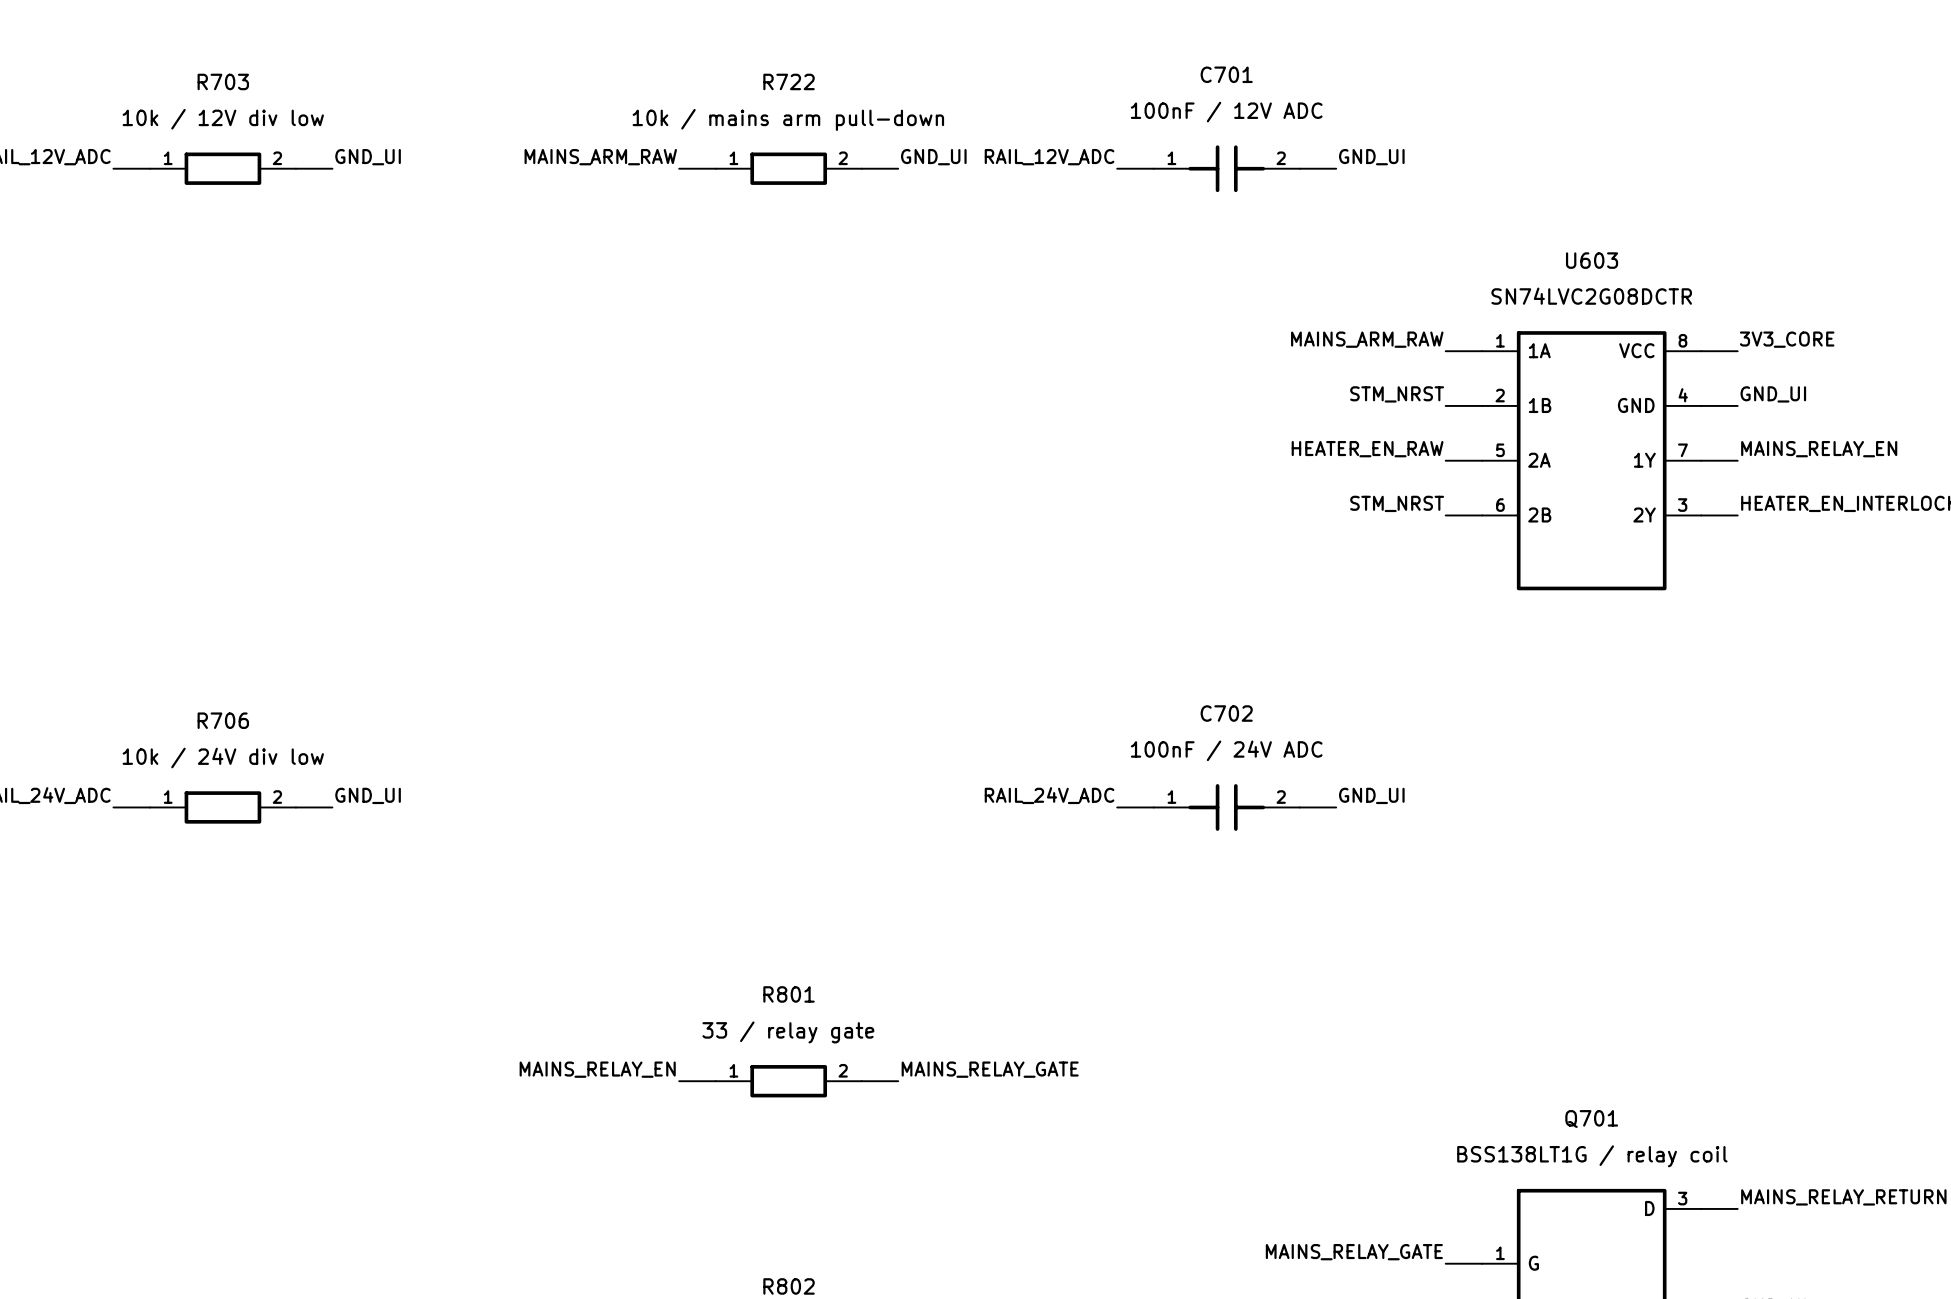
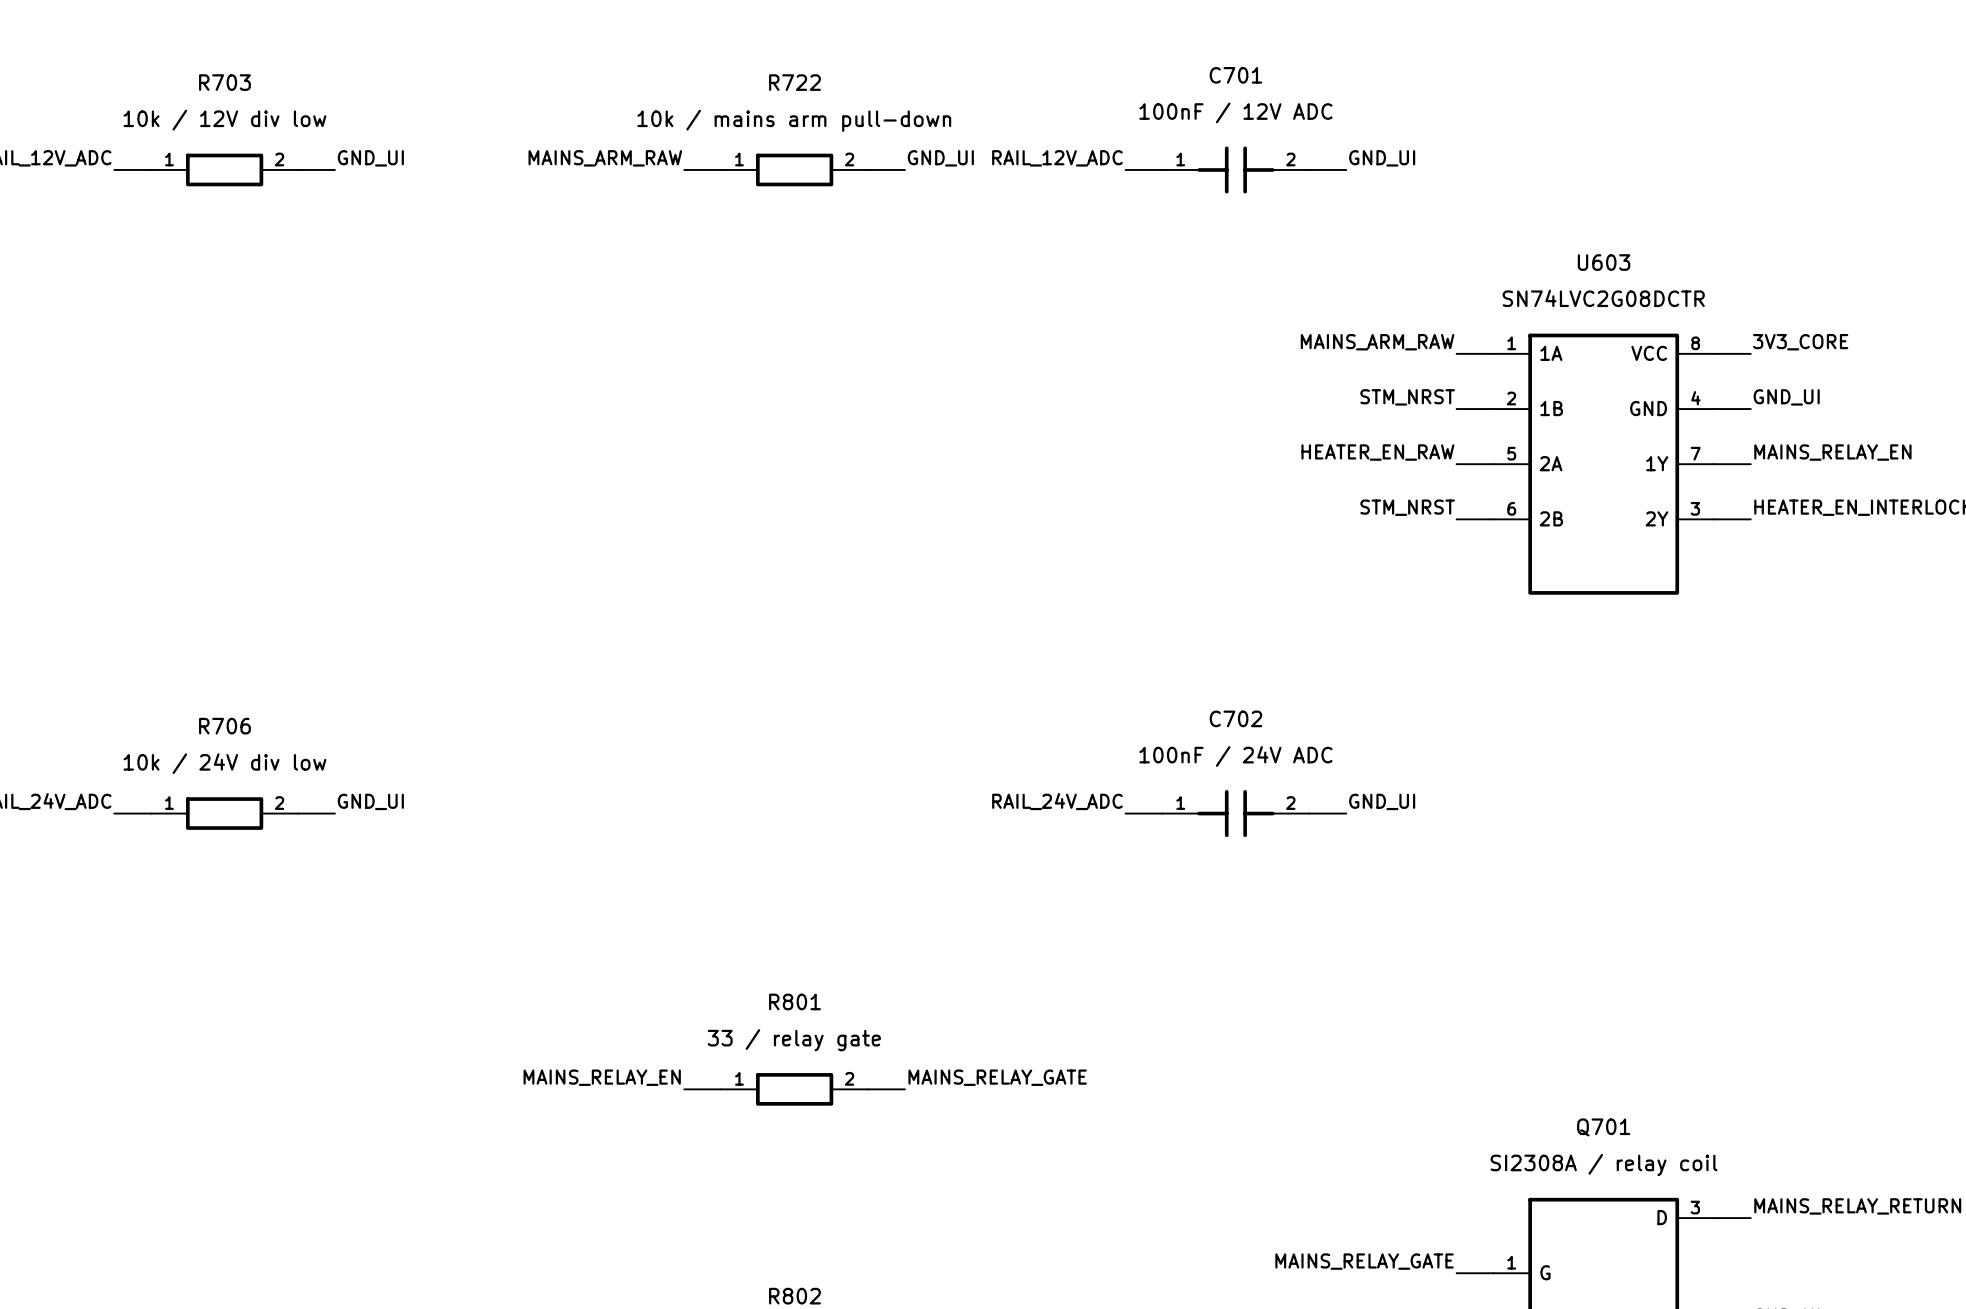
Q701 value: BSS138LT1G / relay coil (1592, 1156) -> SI2308A / relay coil (1604, 1165)

